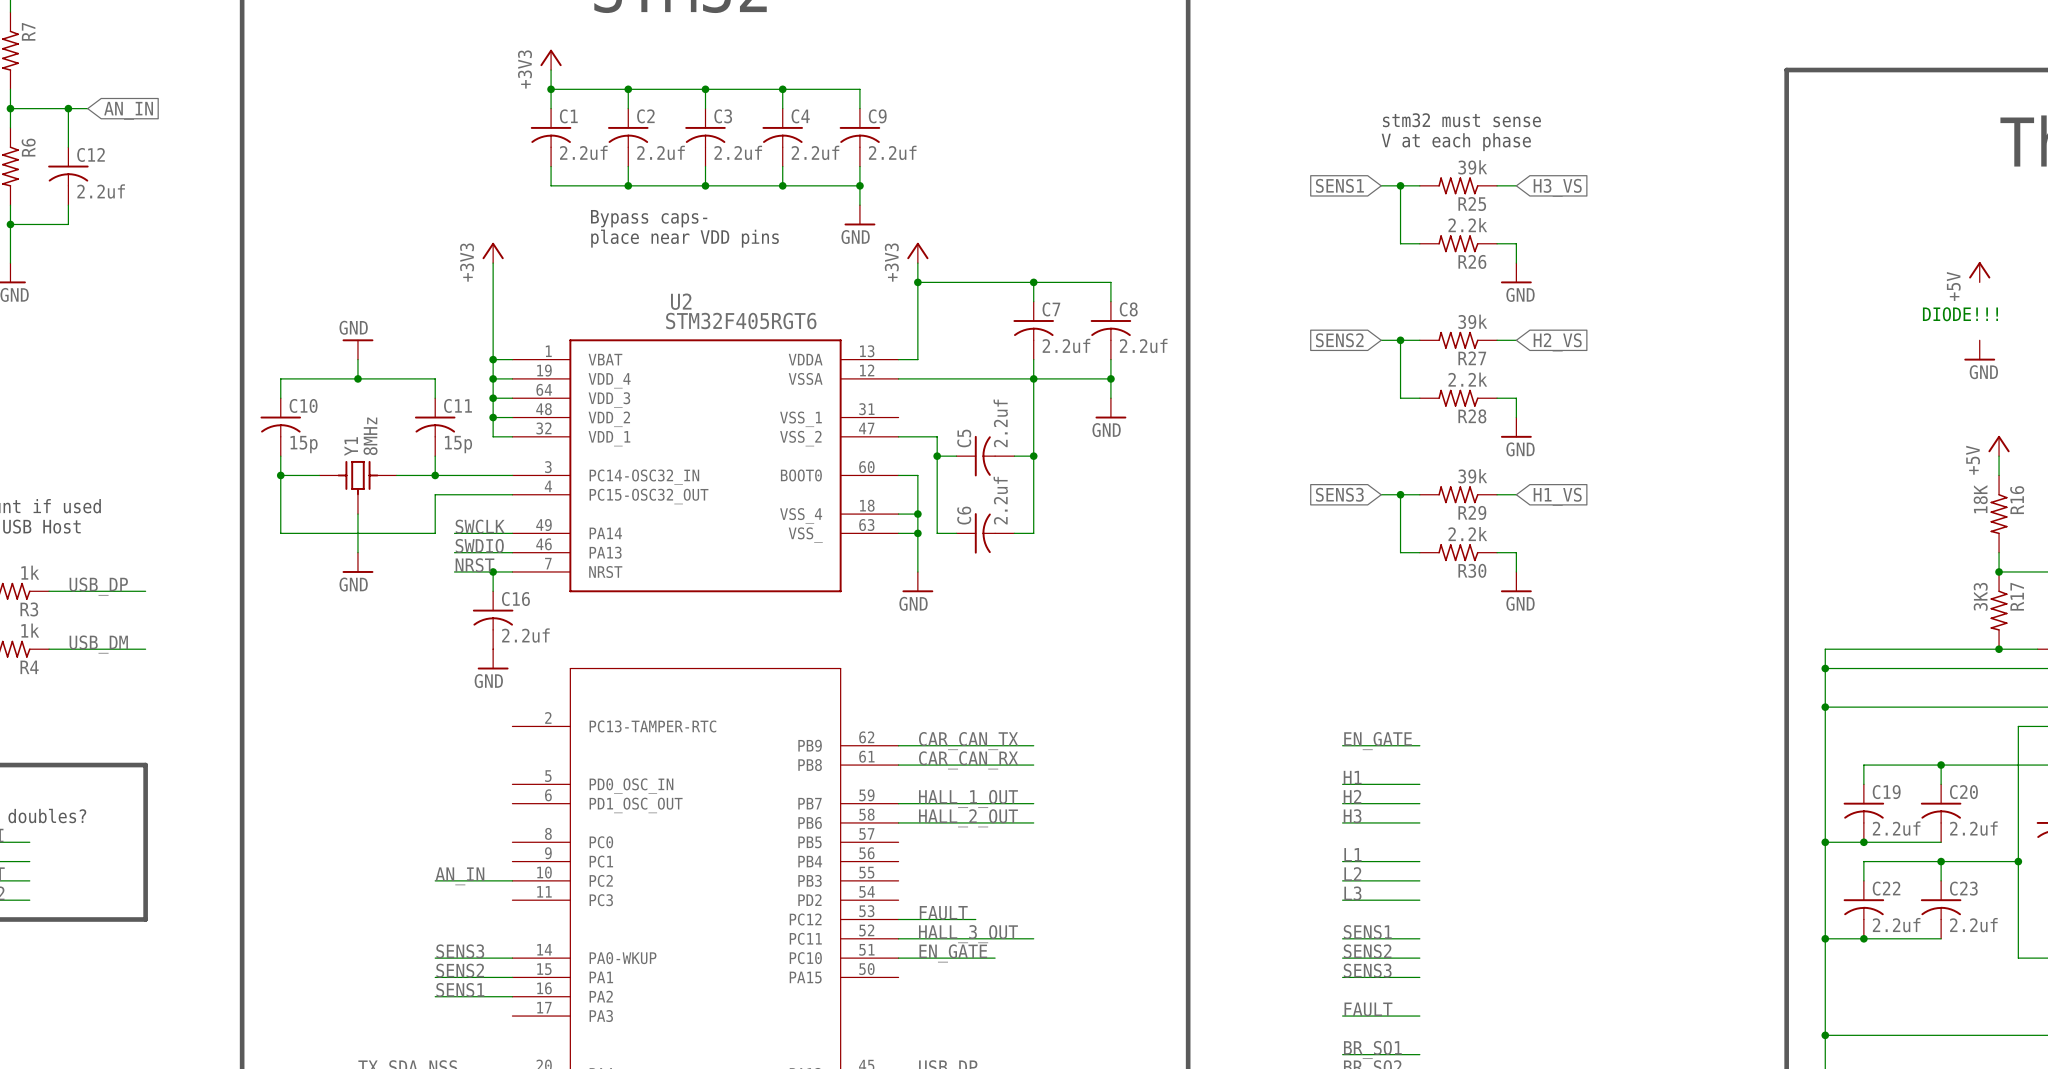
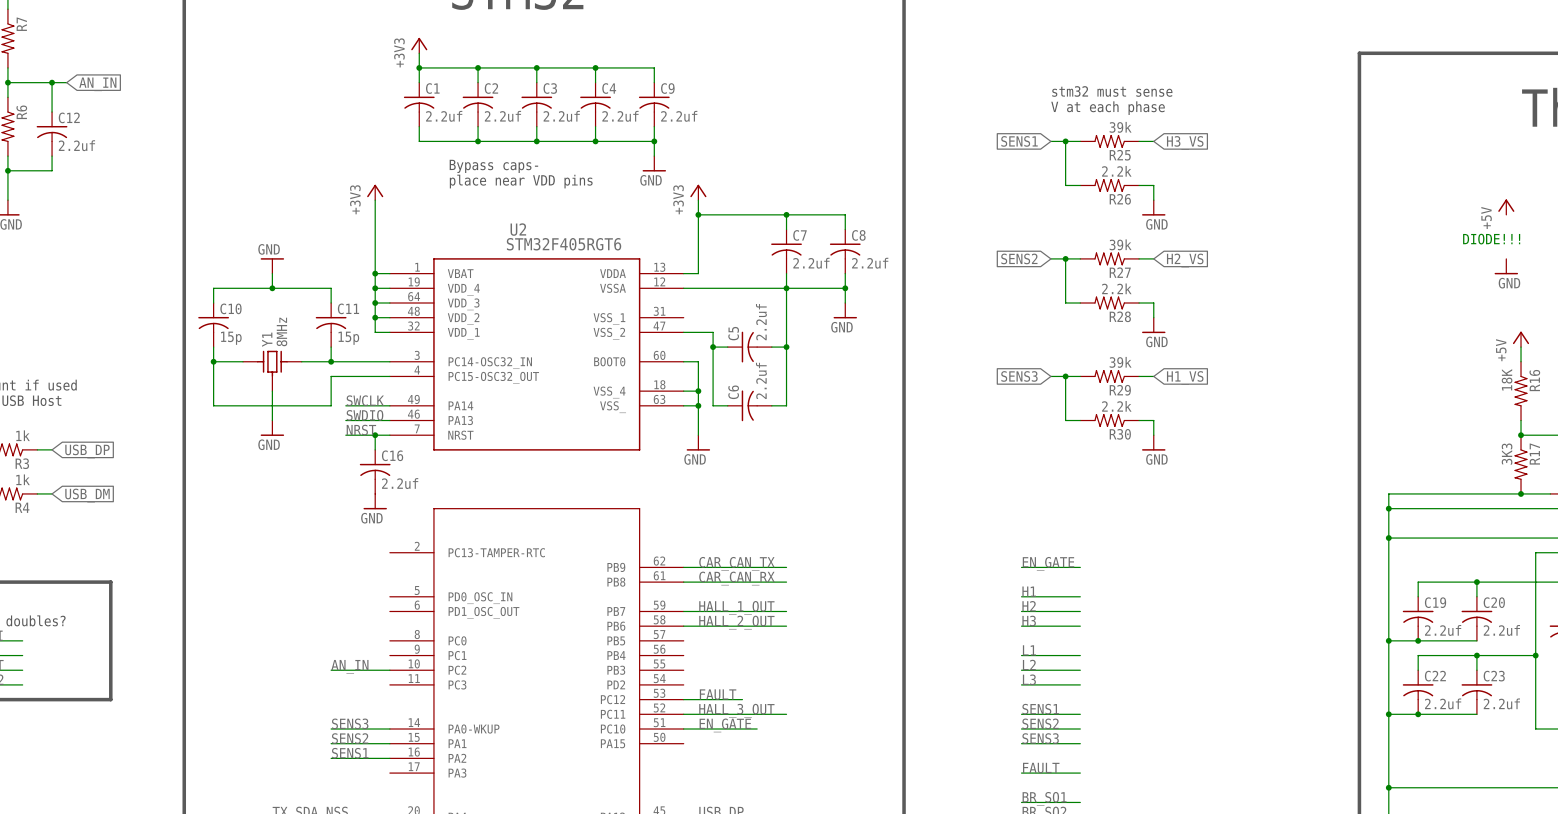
label: USB_DP (98, 586) -> none
wire: (68, 591) (145, 591) -> none
global label: none -> USB_DP (87, 451)
label: USB_DM (98, 644) -> none
wire: (68, 649) (145, 649) -> none
global label: none -> USB_DM (87, 495)

